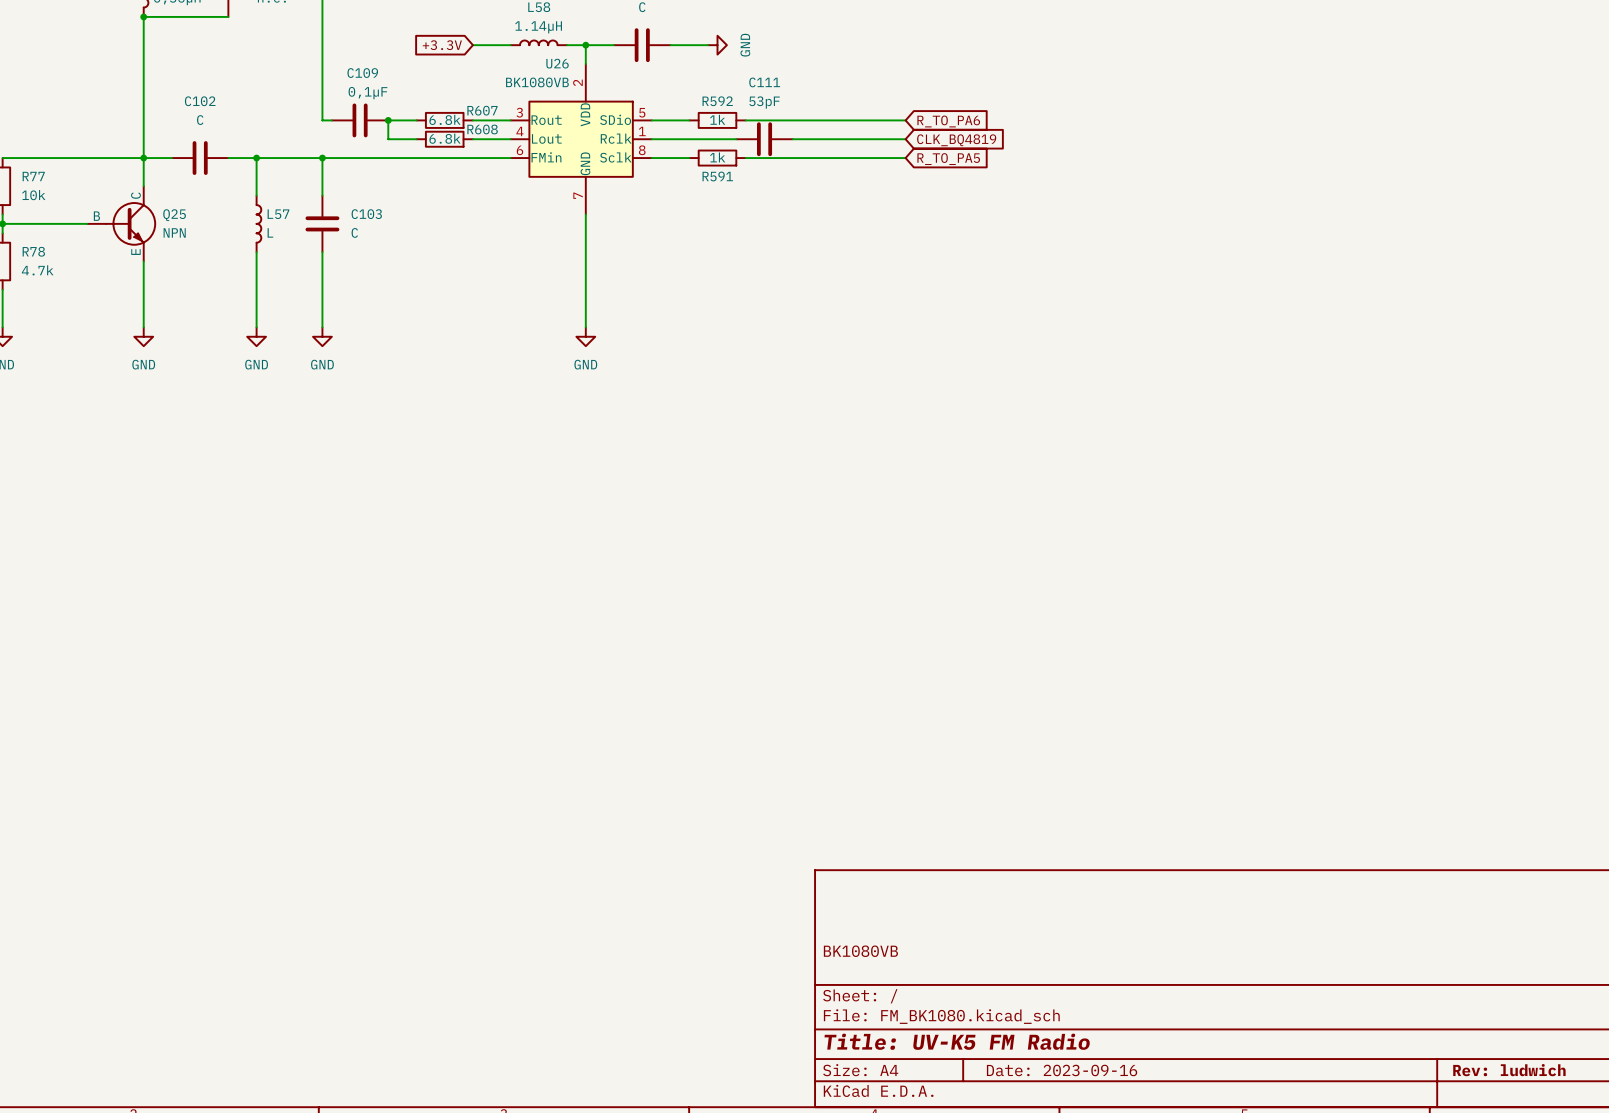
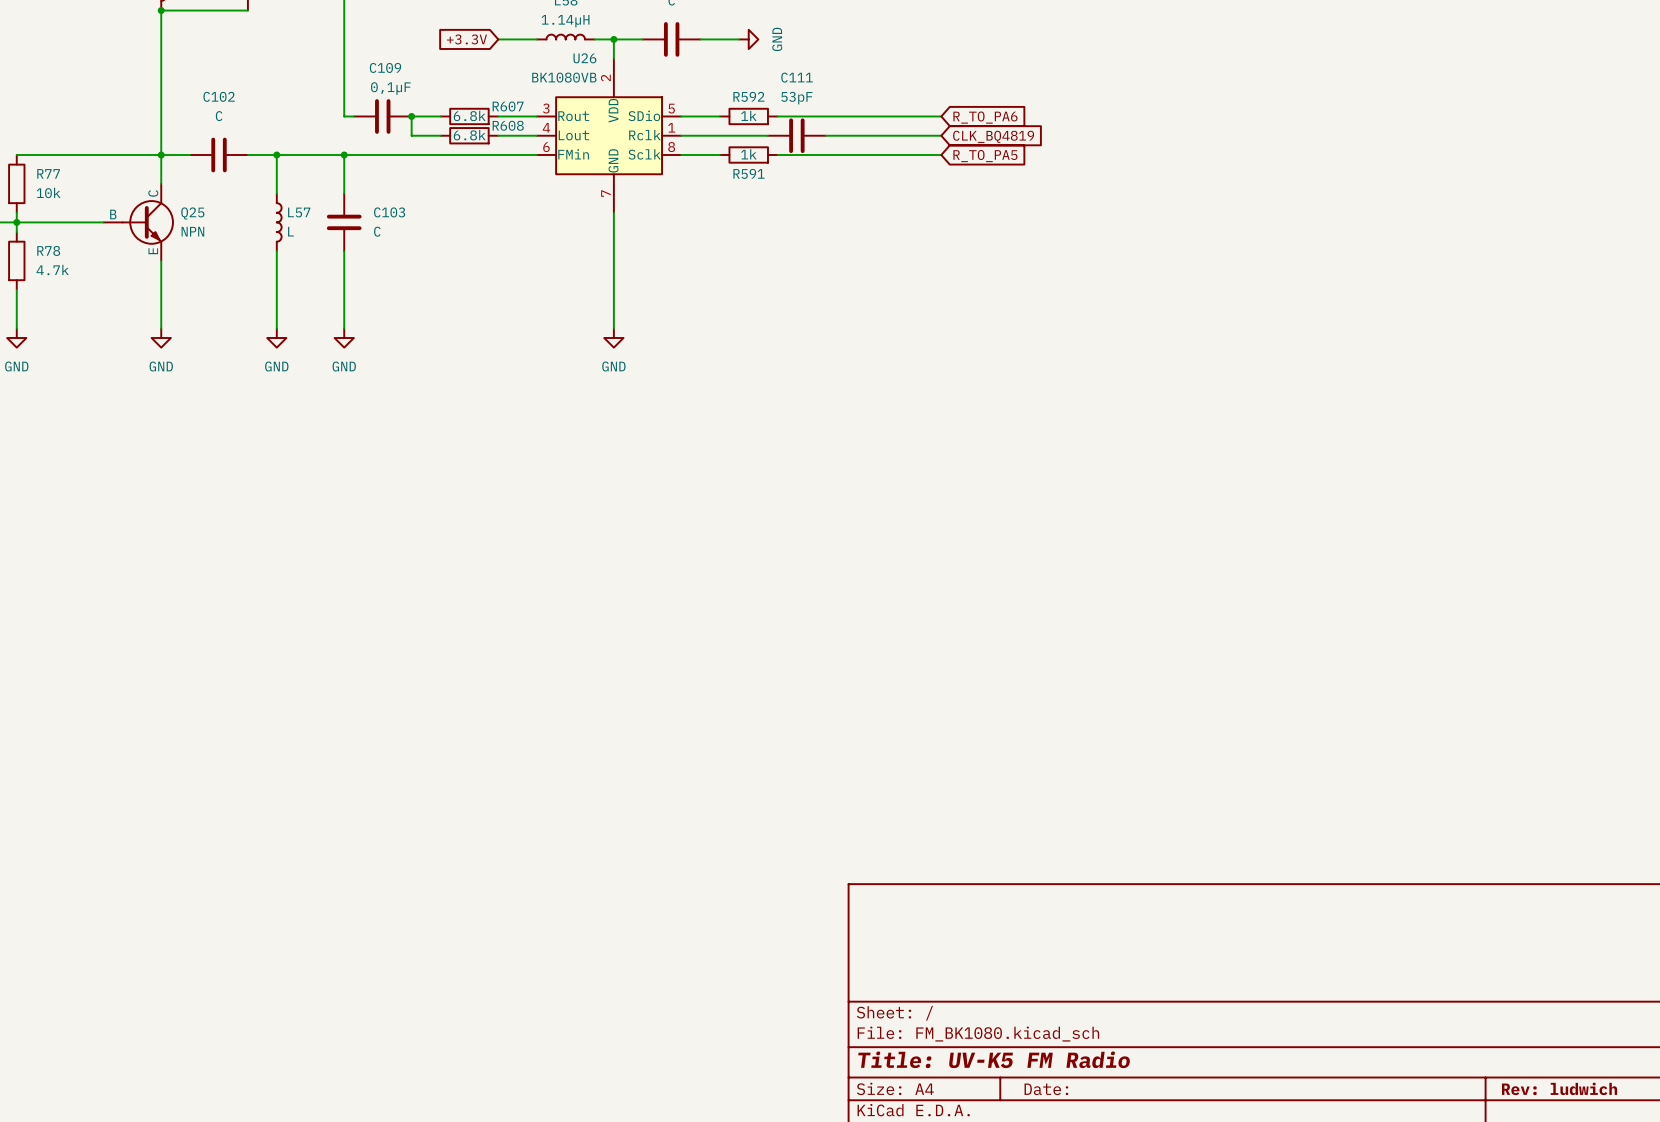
title block: BK1080VB (860, 951) -> none
title block: Date: 2023-09-16 (1062, 1070) -> Date: (1046, 1089)

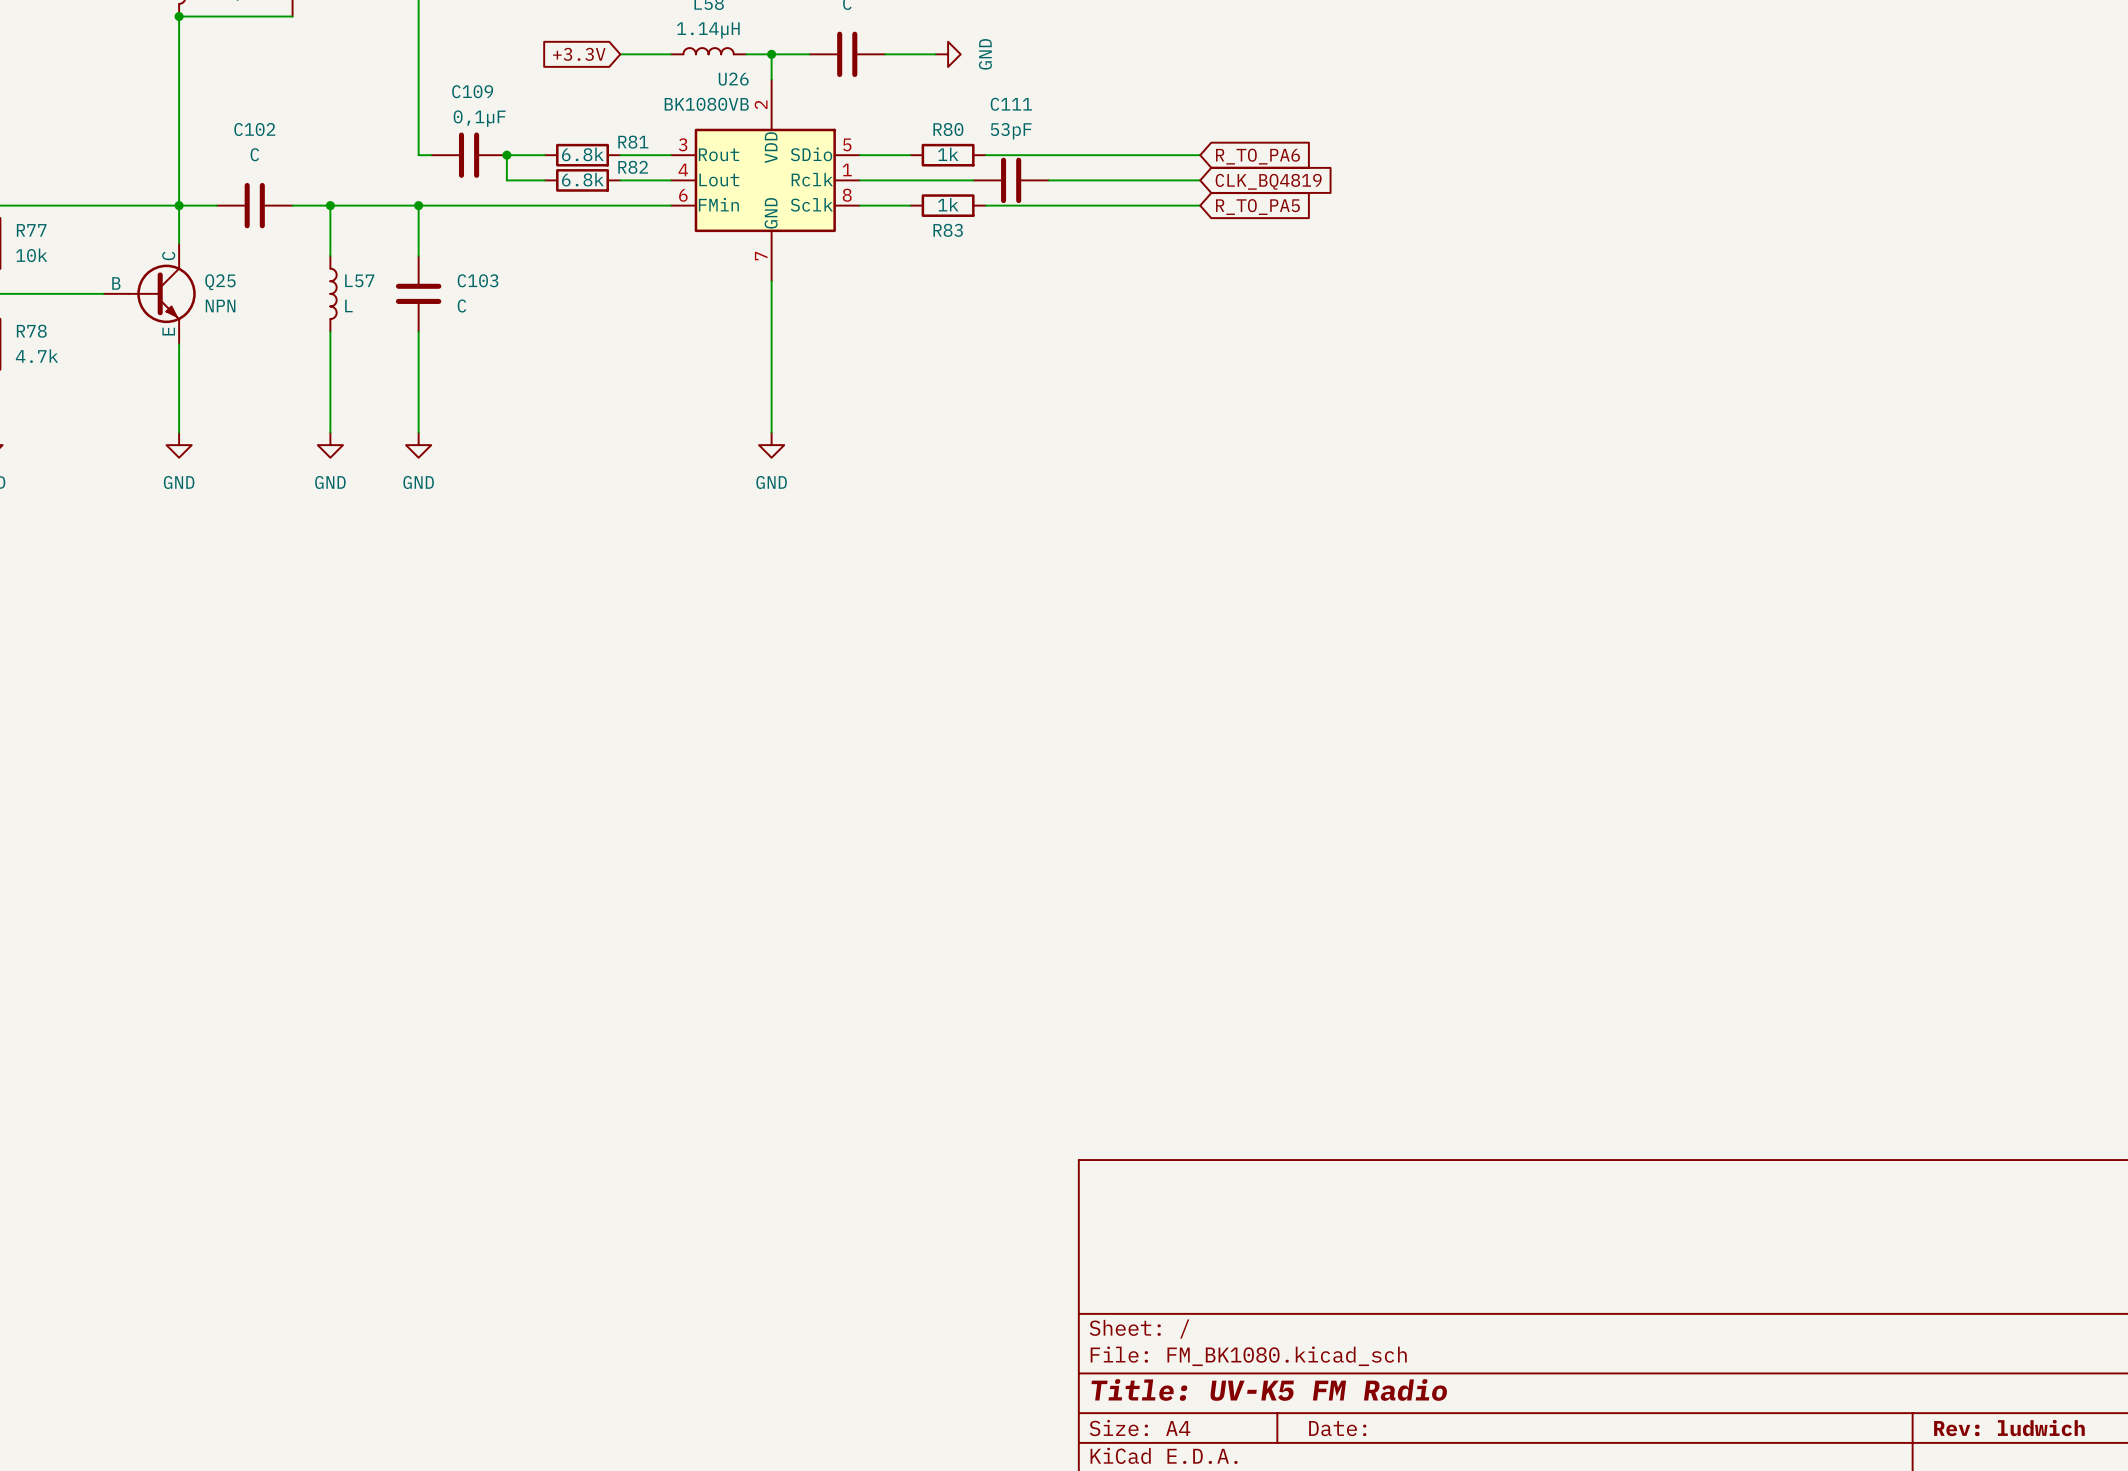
R592 name: R592 (748, 96) -> R80 (948, 129)
R607 name: R607 (508, 106) -> R81 (633, 142)
R608 name: R608 (508, 125) -> R82 (633, 167)
R591 name: R591 (749, 173) -> R83 (948, 230)

